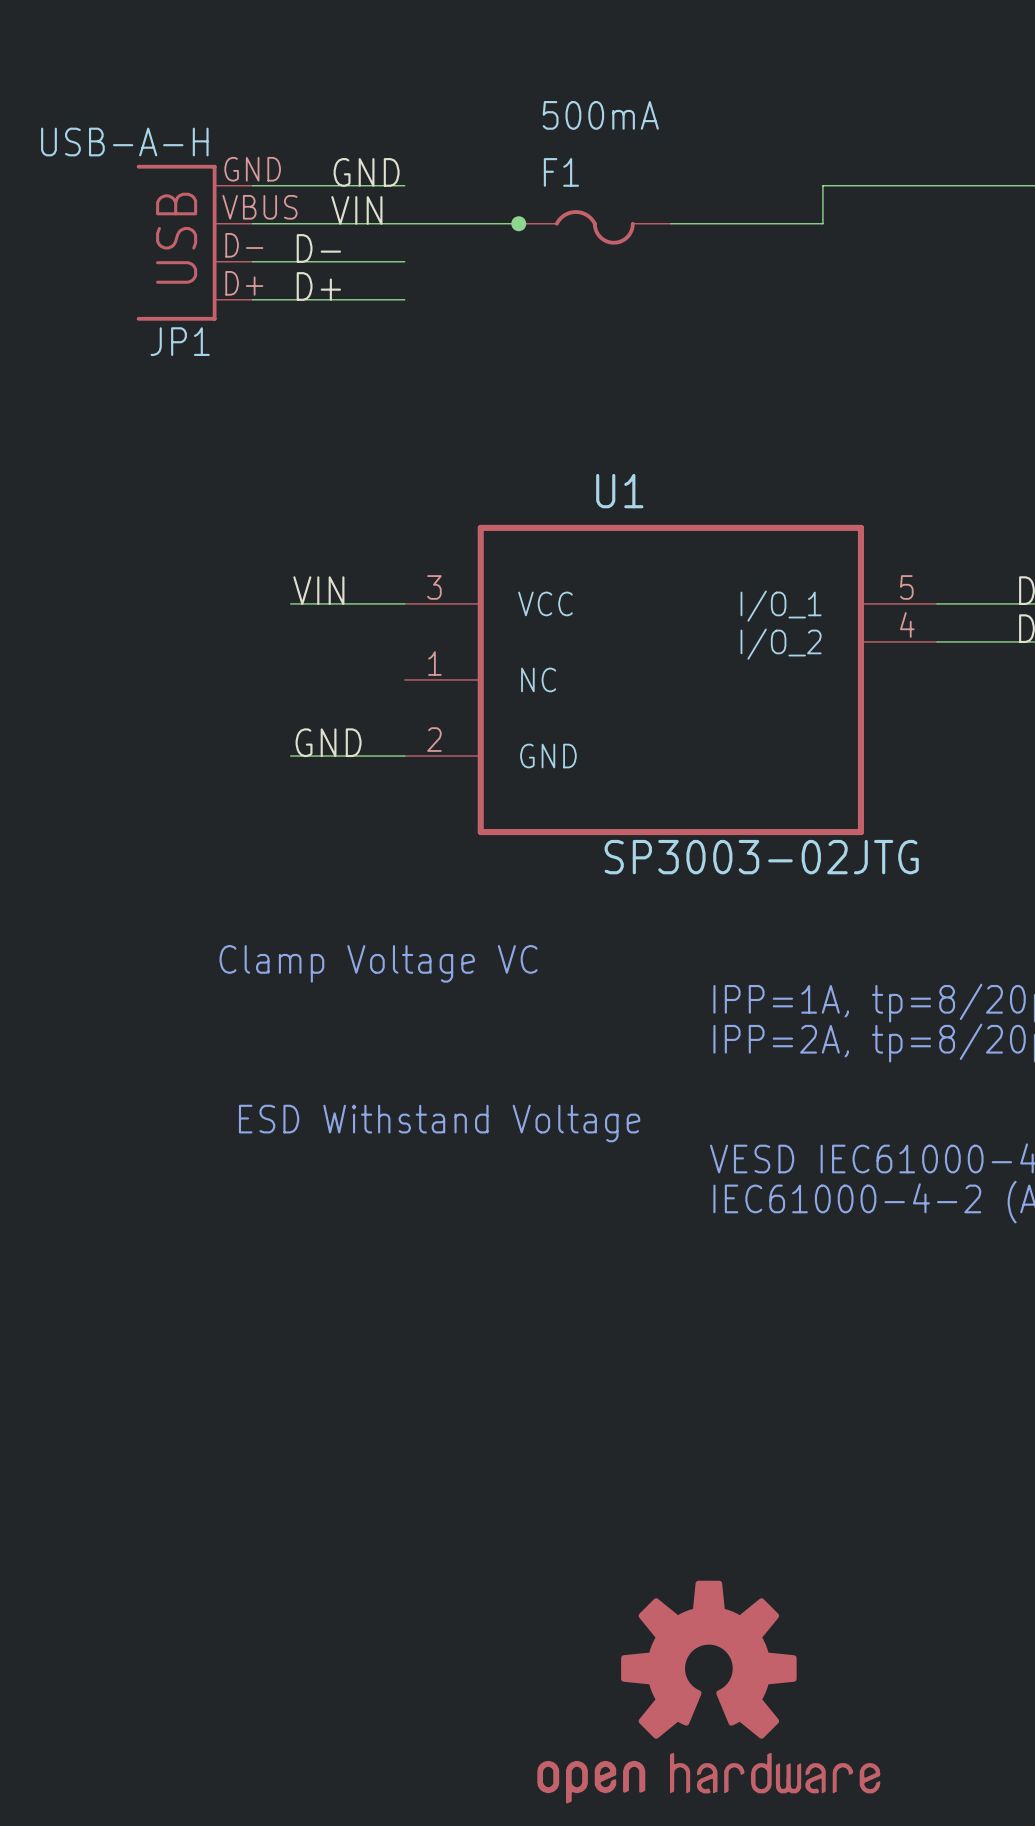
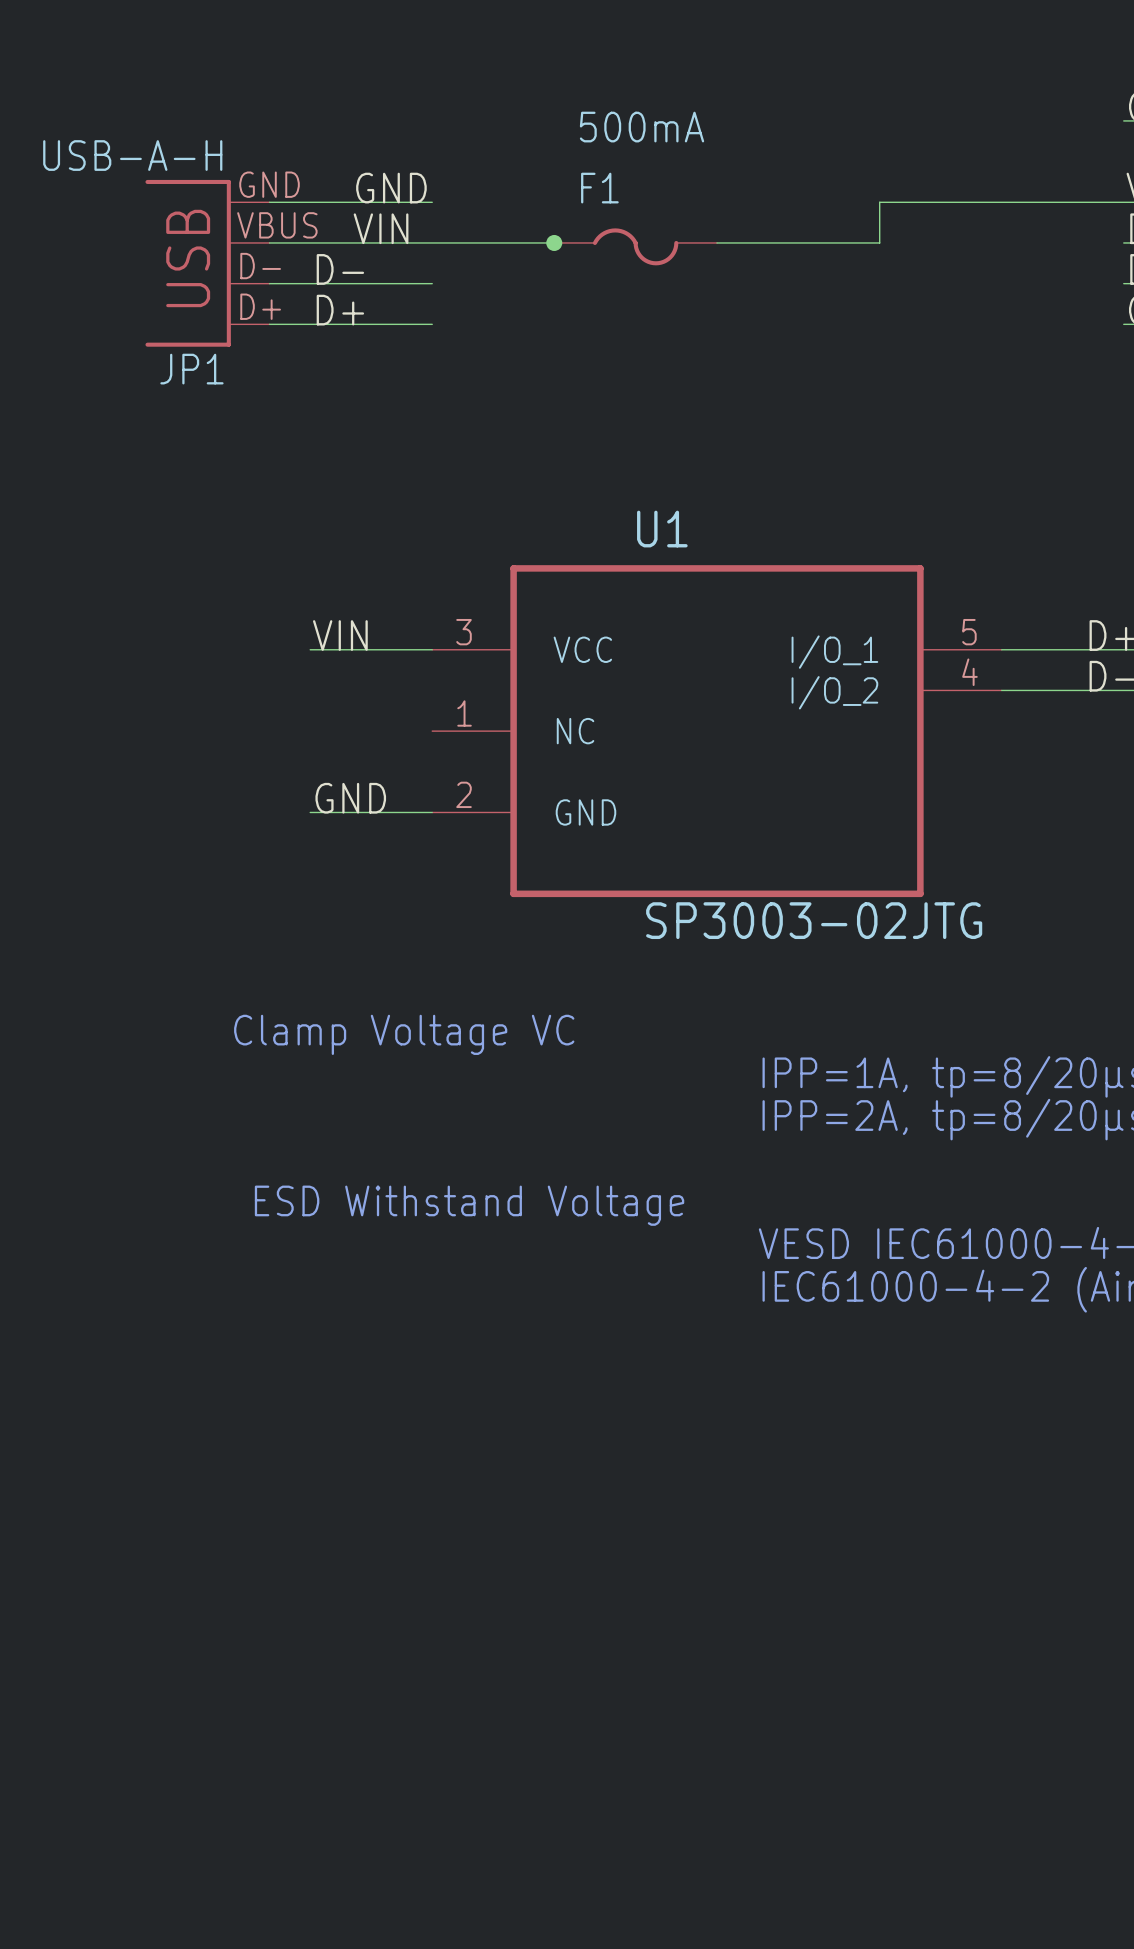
part: (708, 1692) -> none

